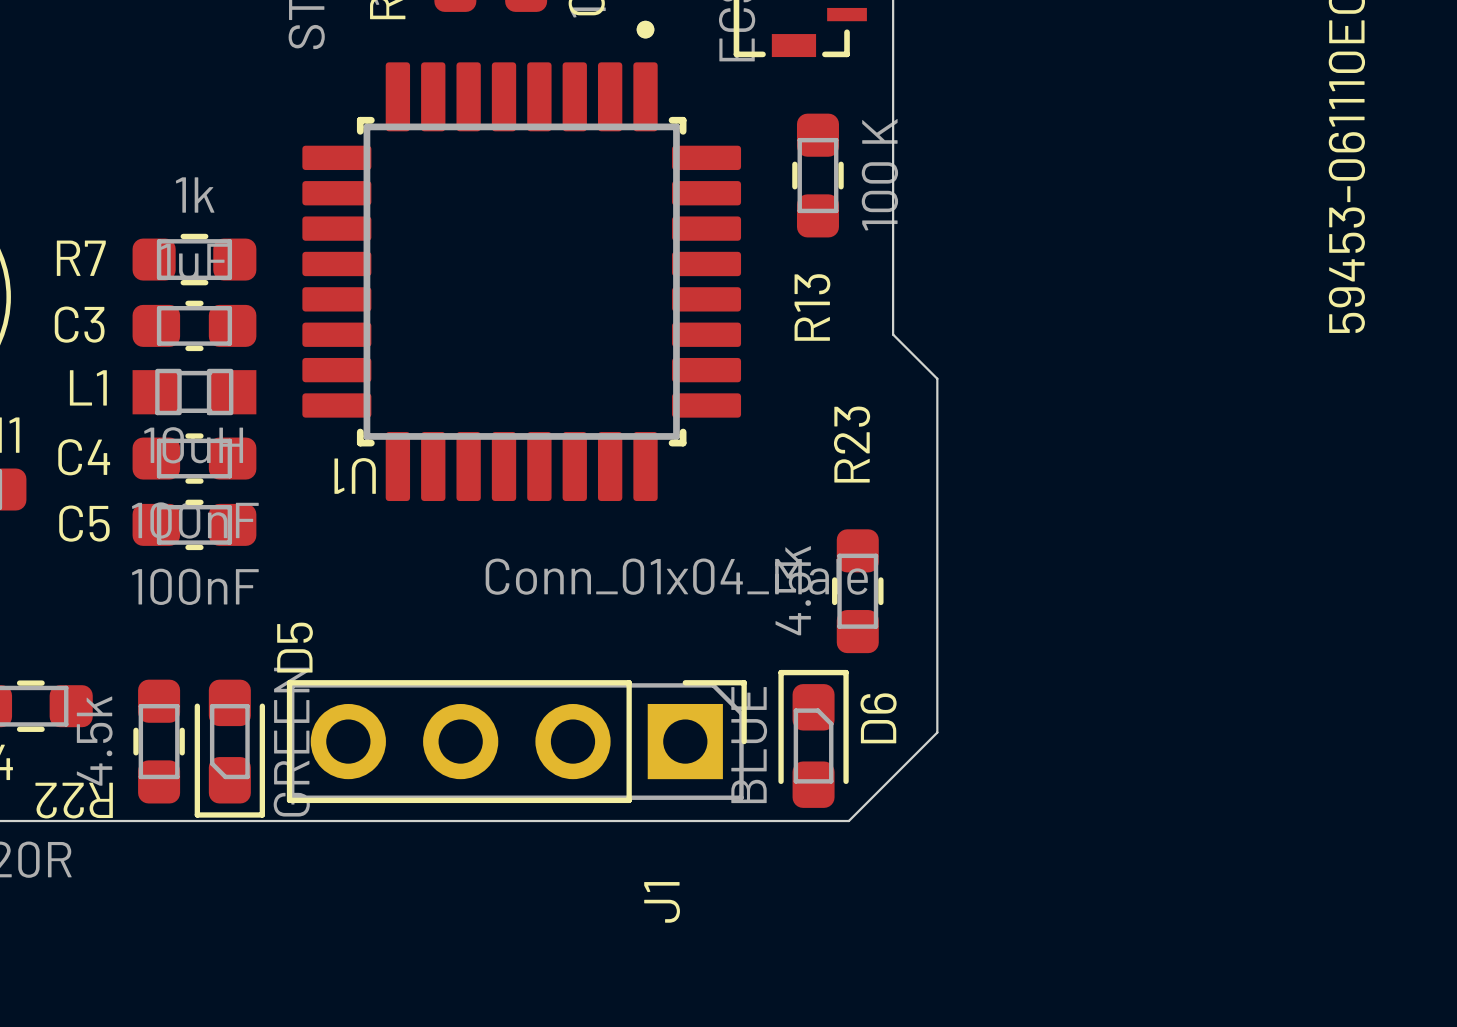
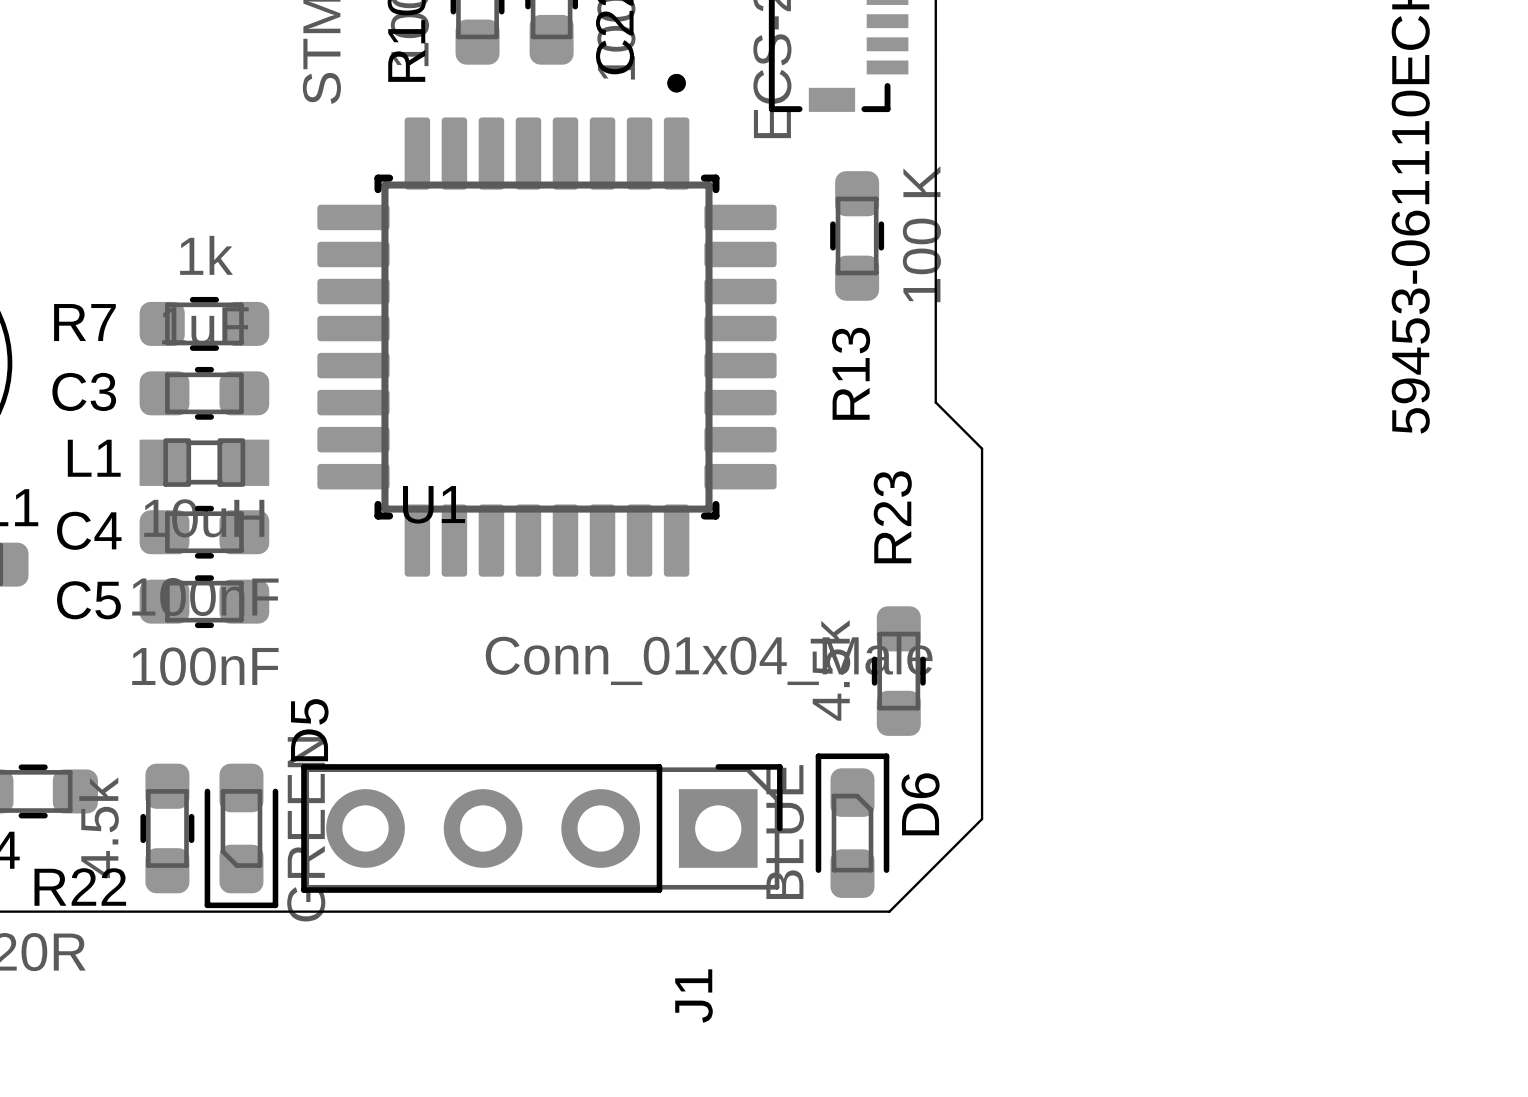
U1 name rotation: 0° (355, 475) -> 180° (434, 504)
U1 name position: U1 (355, 475) -> U1 (434, 504)
R22 name rotation: 0° (74, 800) -> 180° (80, 887)

